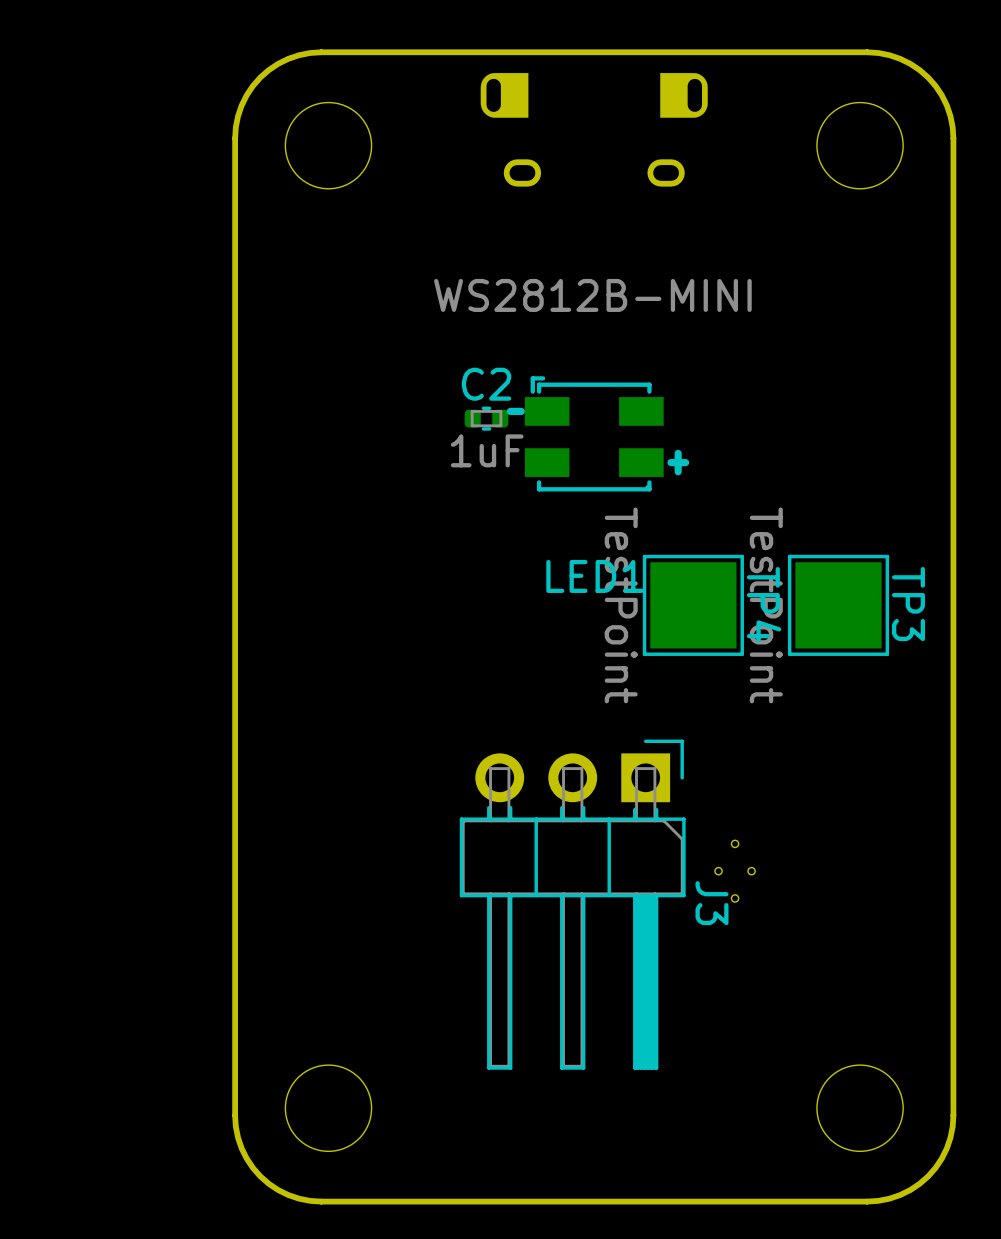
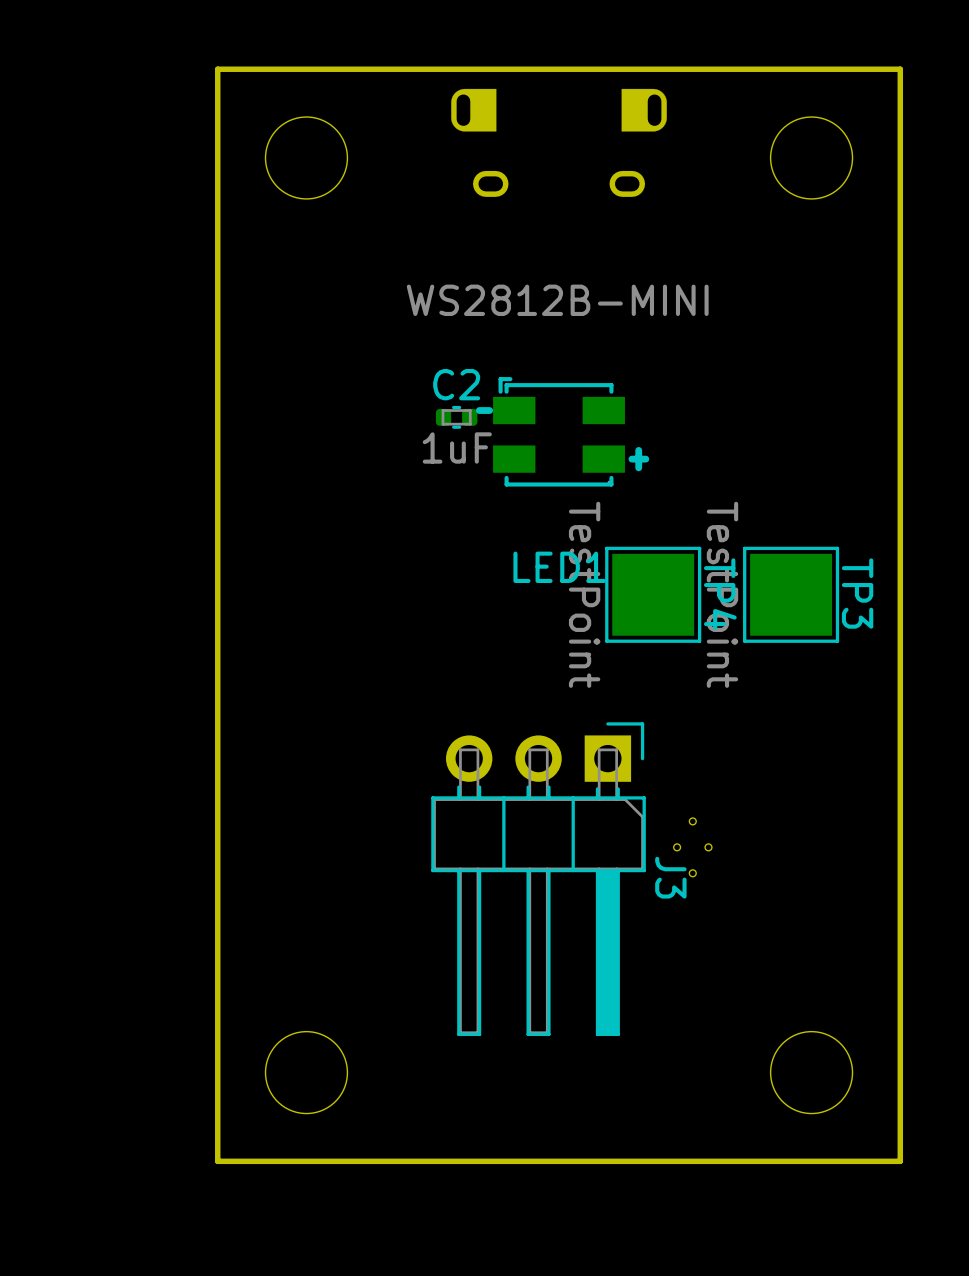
board edge: (321, 52) (288, 58) (260, 77) (241, 105) (235, 138) -> (299, 69) (217, 69) (217, 151)
board edge: (867, 52) (900, 58) (928, 77) (946, 105) (953, 138) -> (818, 69) (900, 69) (900, 151)
board edge: (235, 1115) (241, 1148) (260, 1176) (288, 1195) (321, 1201) -> (217, 1079) (217, 1161) (299, 1161)
board edge: (953, 1115) (946, 1148) (928, 1176) (900, 1195) (867, 1201) -> (900, 1079) (900, 1161) (818, 1161)

